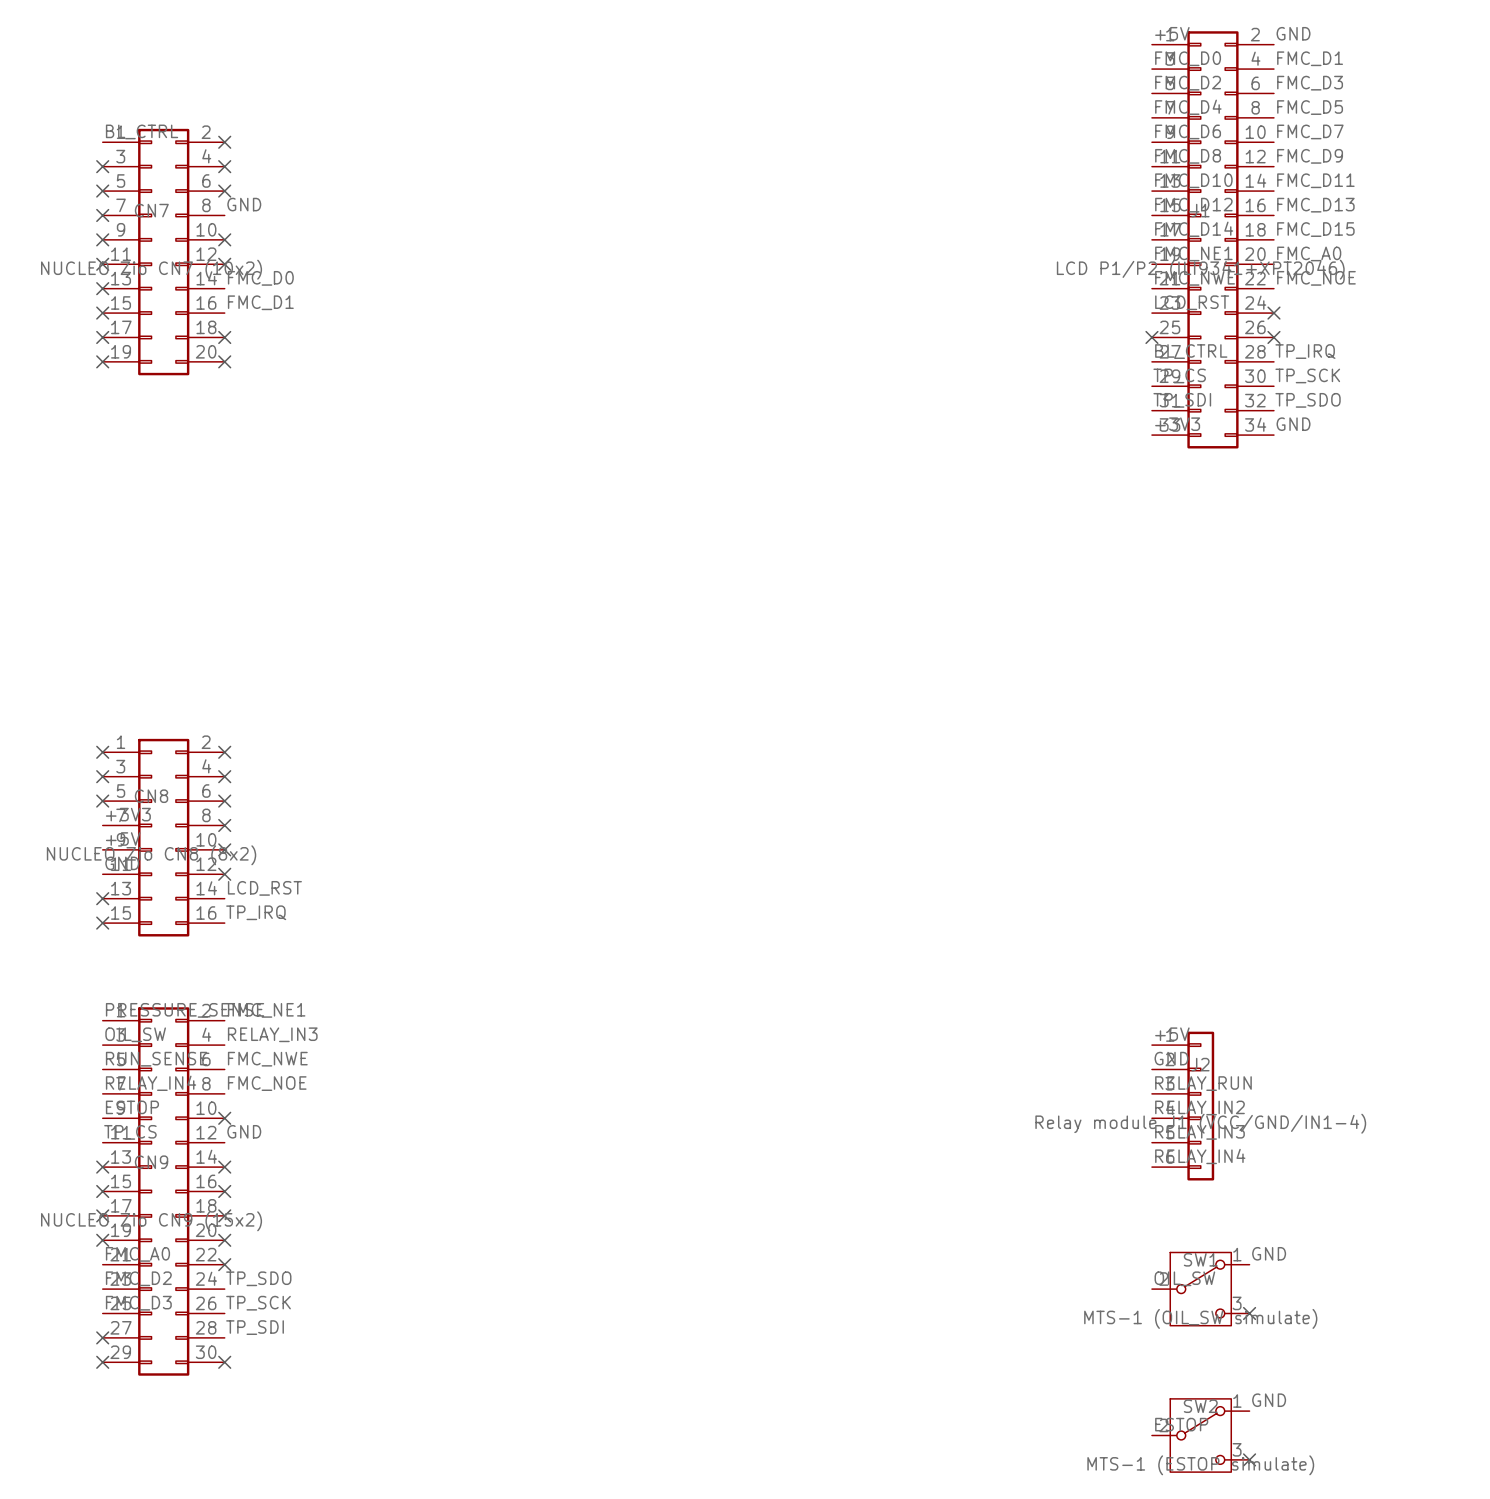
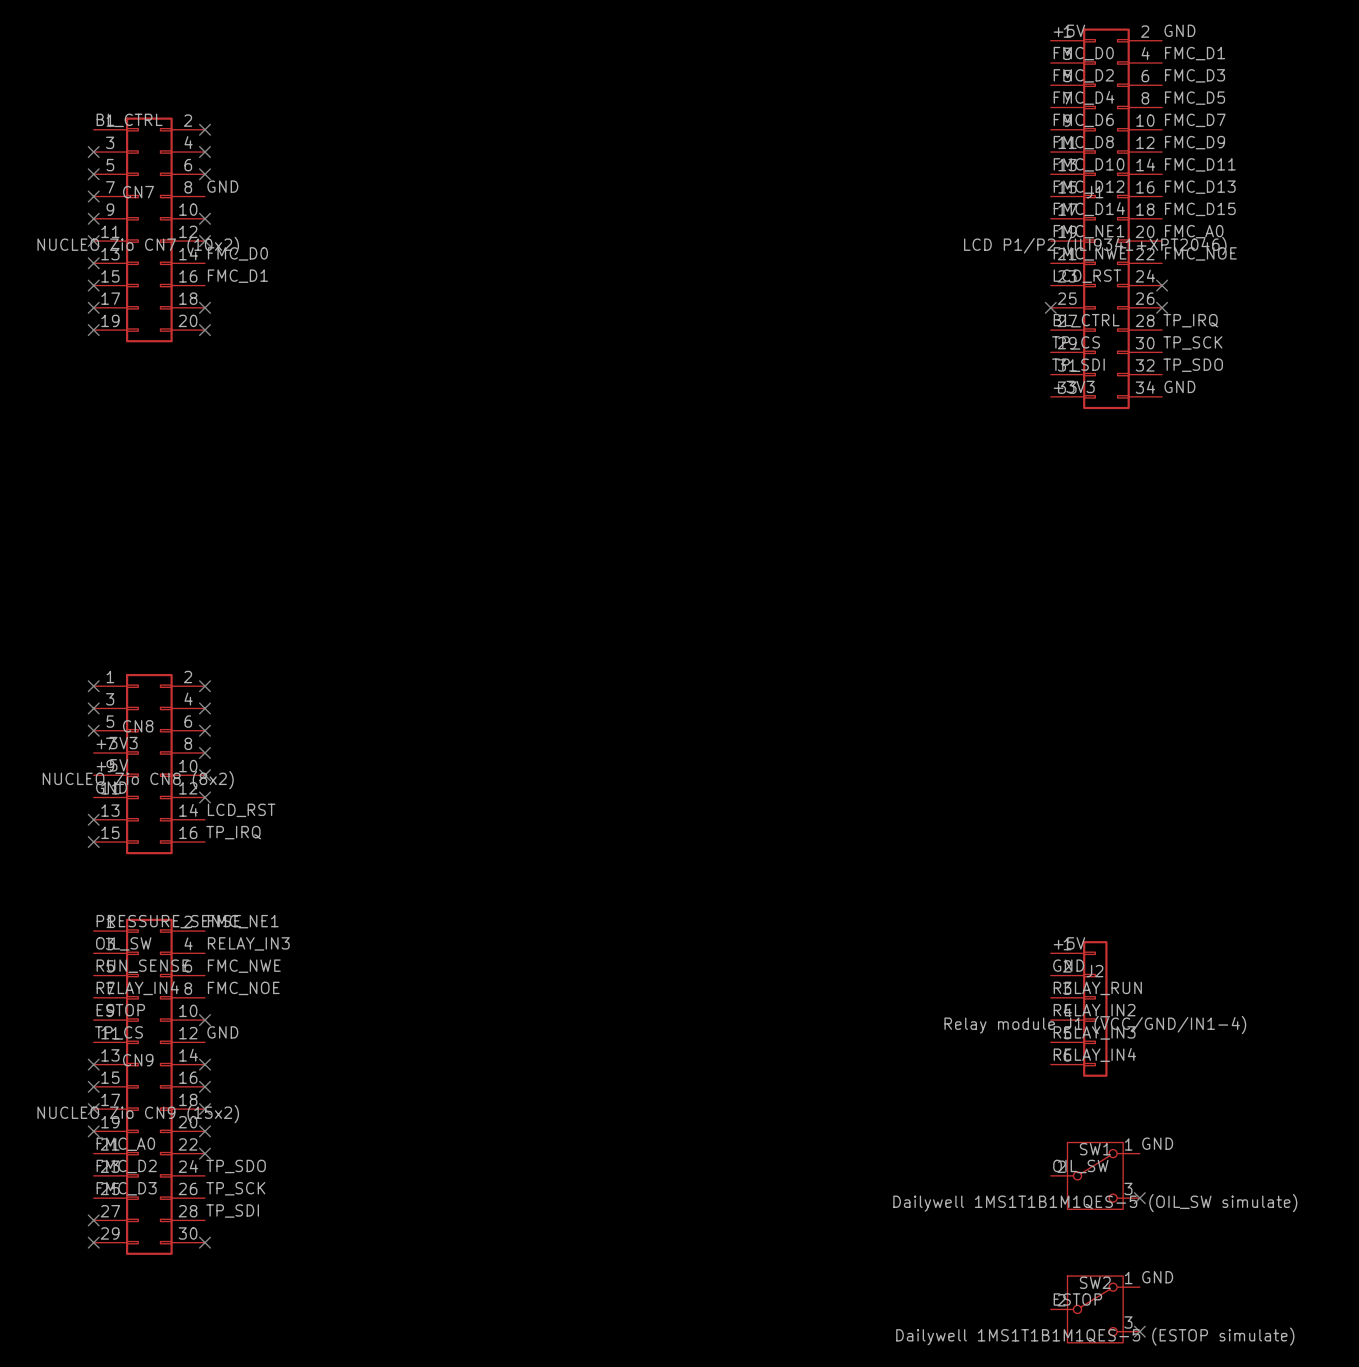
SW1 value: MTS-1 (OIL_SW simulate) (1200, 1318) -> Dailywell 1MS1T1B1M1QES-5 (OIL_SW simulate) (1095, 1203)
SW2 value: MTS-1 (ESTOP simulate) (1200, 1465) -> Dailywell 1MS1T1B1M1QES-5 (ESTOP simulate) (1095, 1336)

